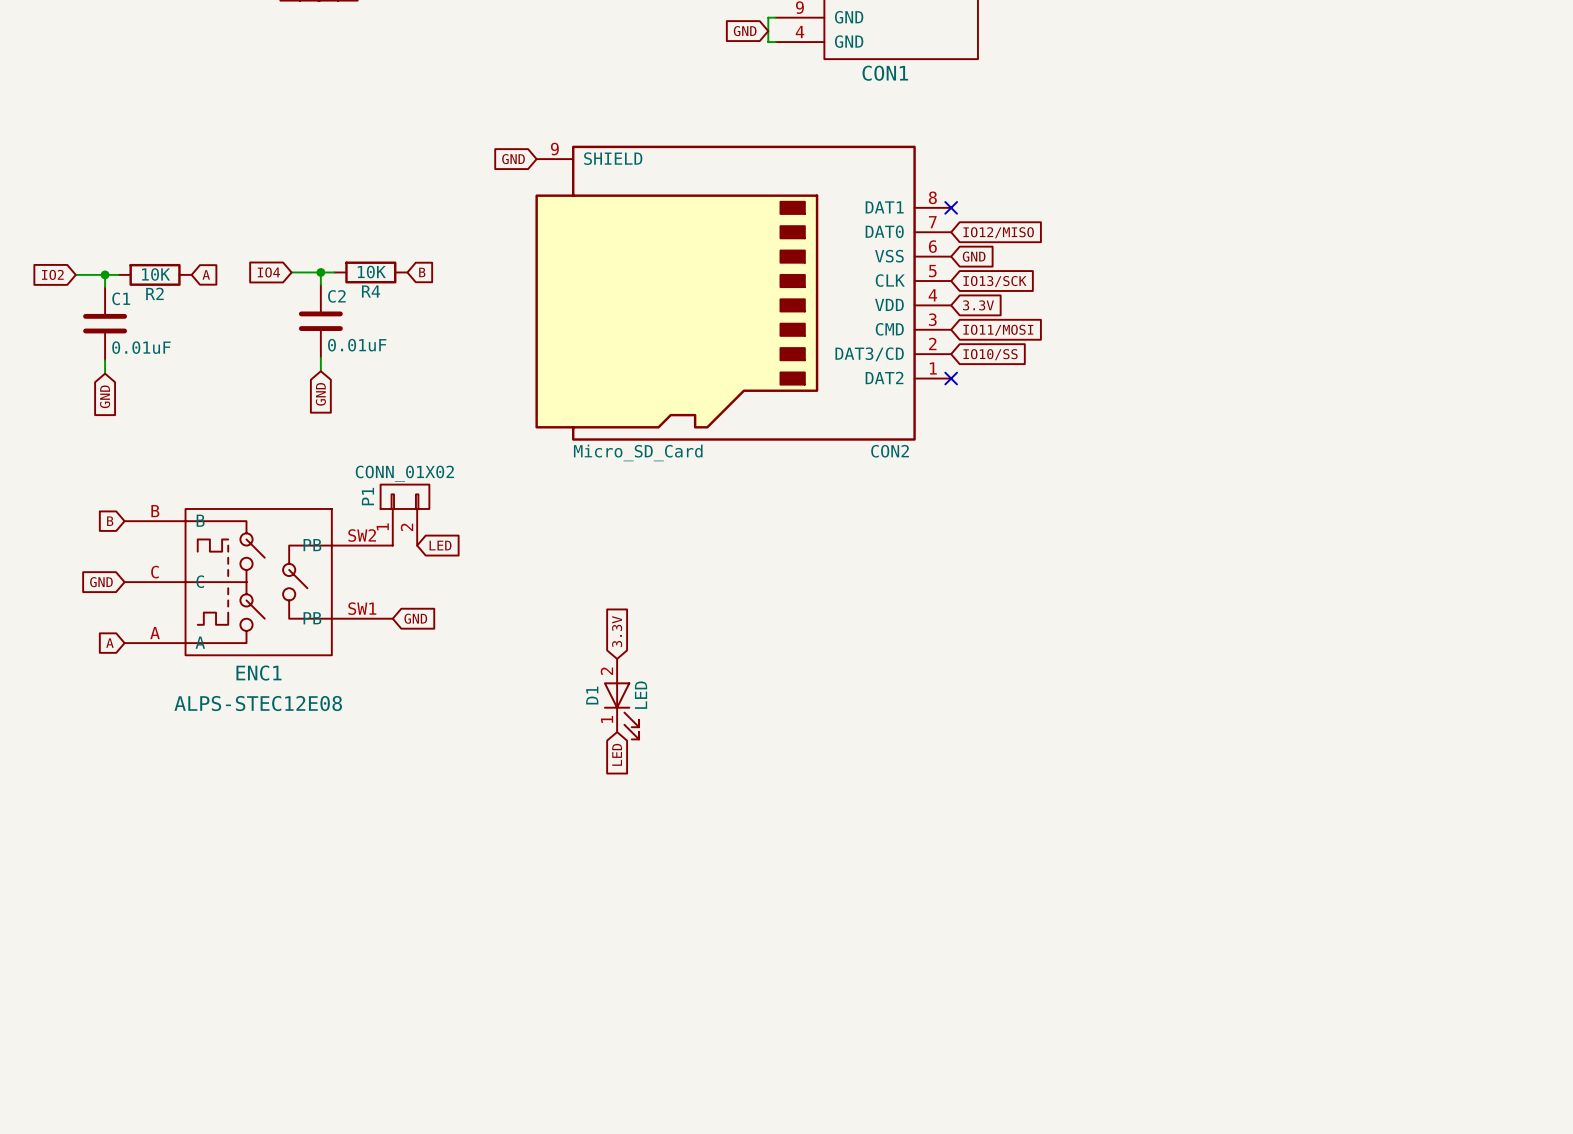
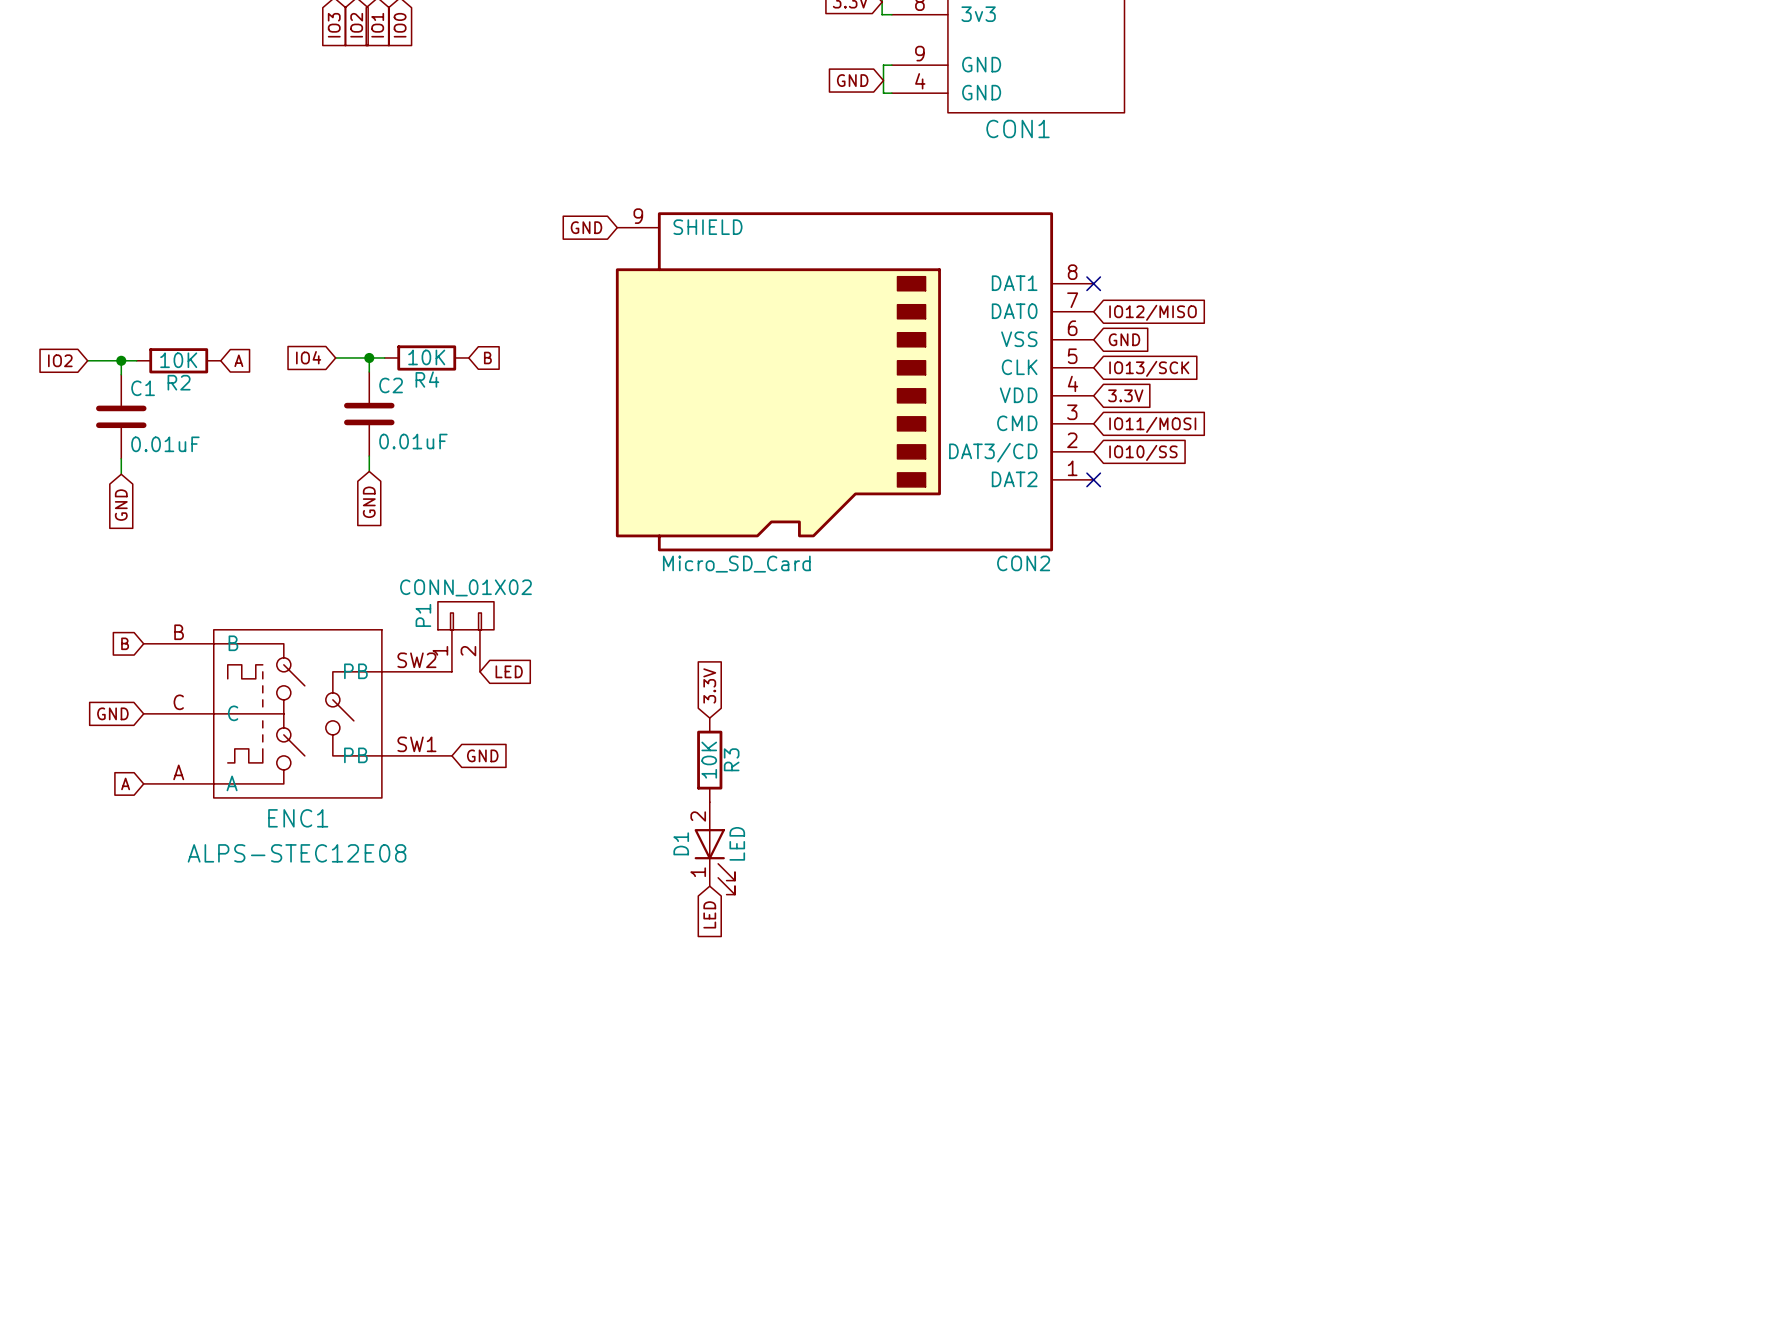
R3: none -> 10K (709, 760)
global label position: 3.3V (617, 631) -> 3.3V (709, 685)

